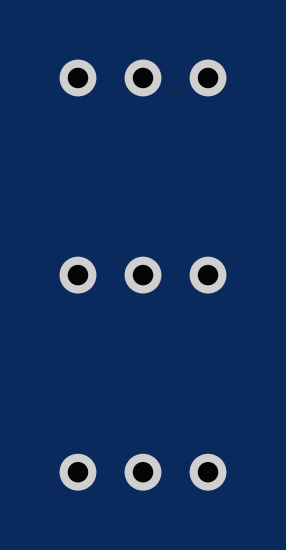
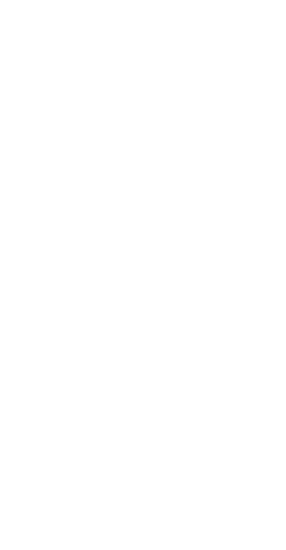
part: (143, 77) -> none
part: (143, 275) -> none
part: (143, 472) -> none

